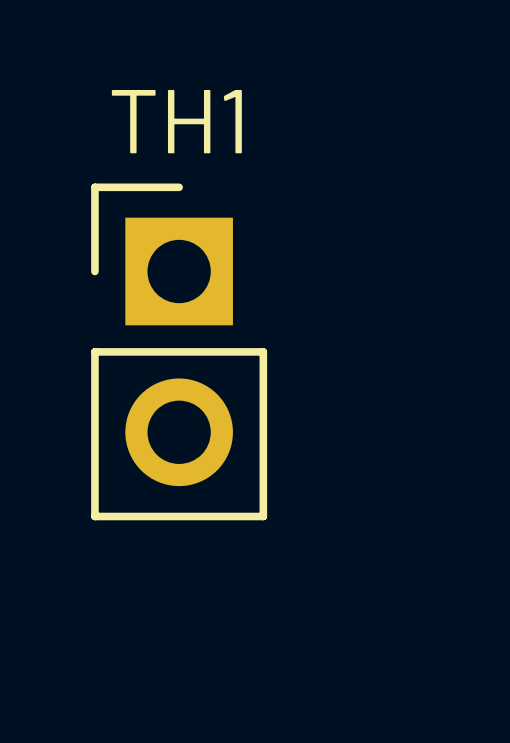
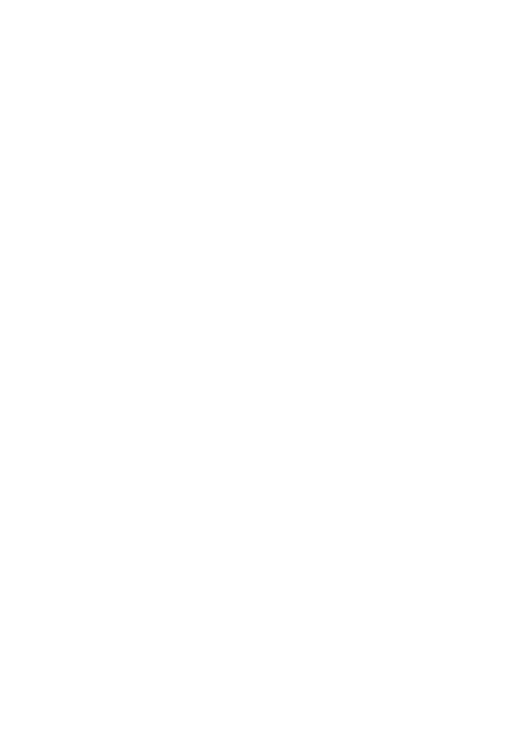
TH1: (179, 351) -> none

